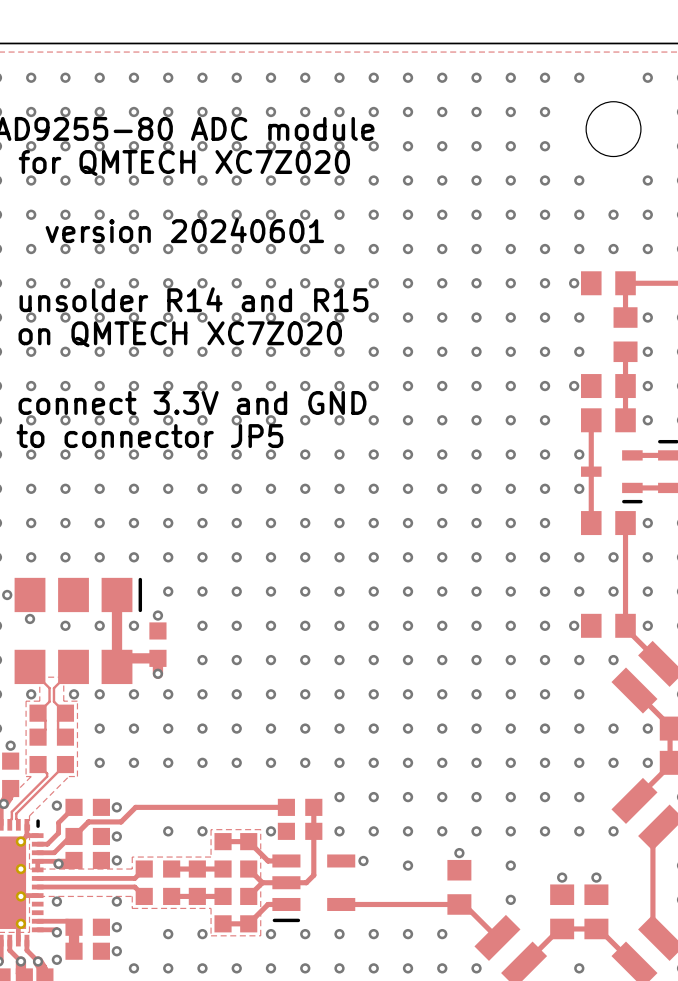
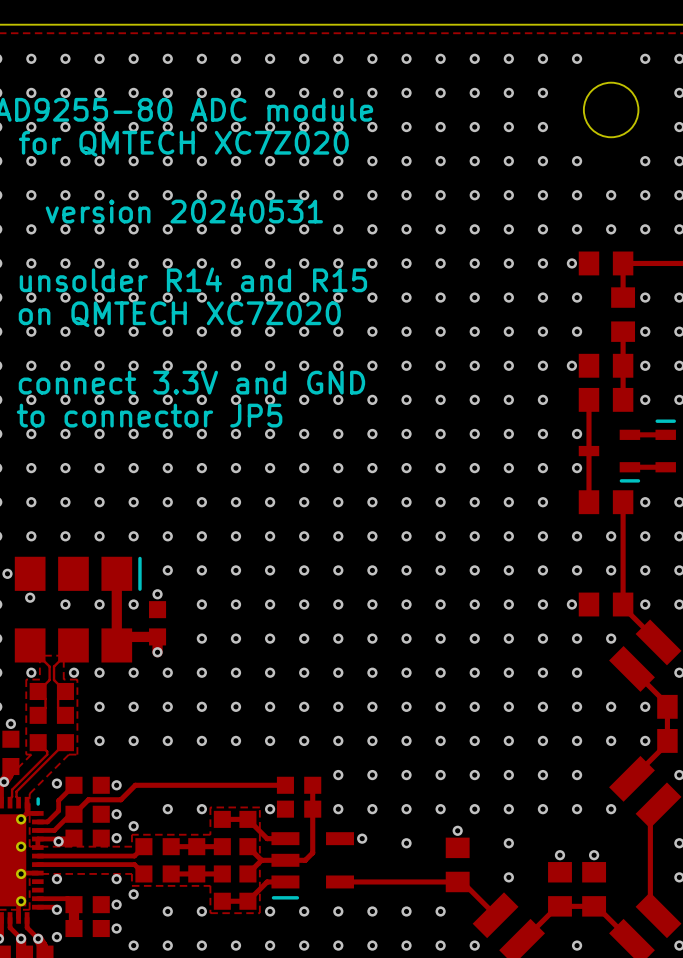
text: version 20240601 (184, 230) -> version 20240531 (184, 211)
via: none -> (133, 826)
via: none -> (133, 894)

